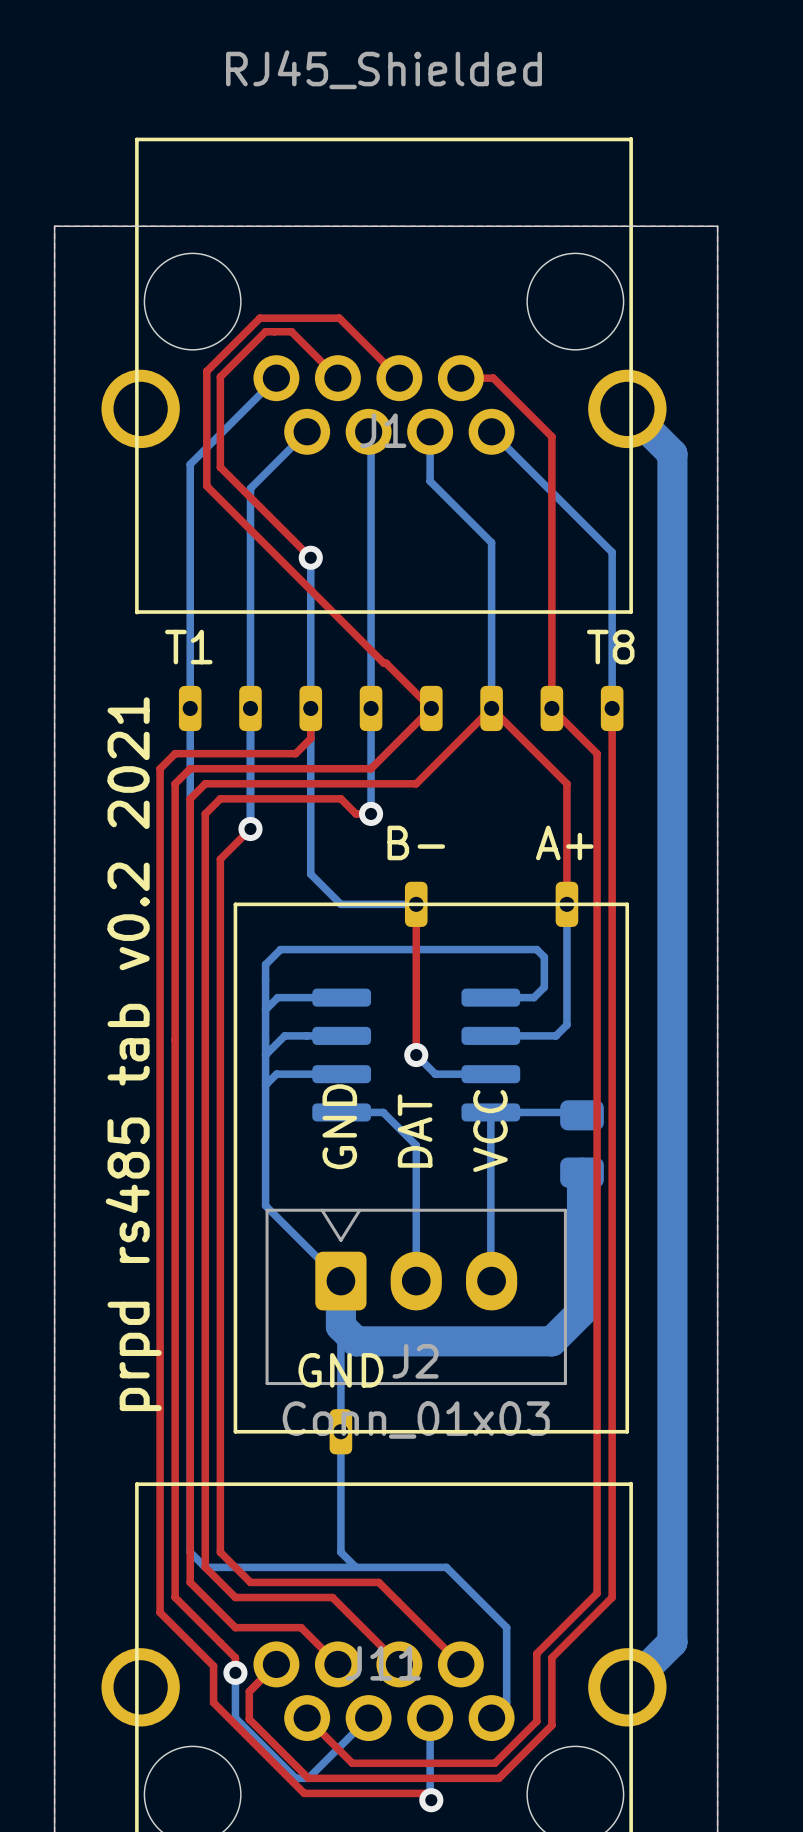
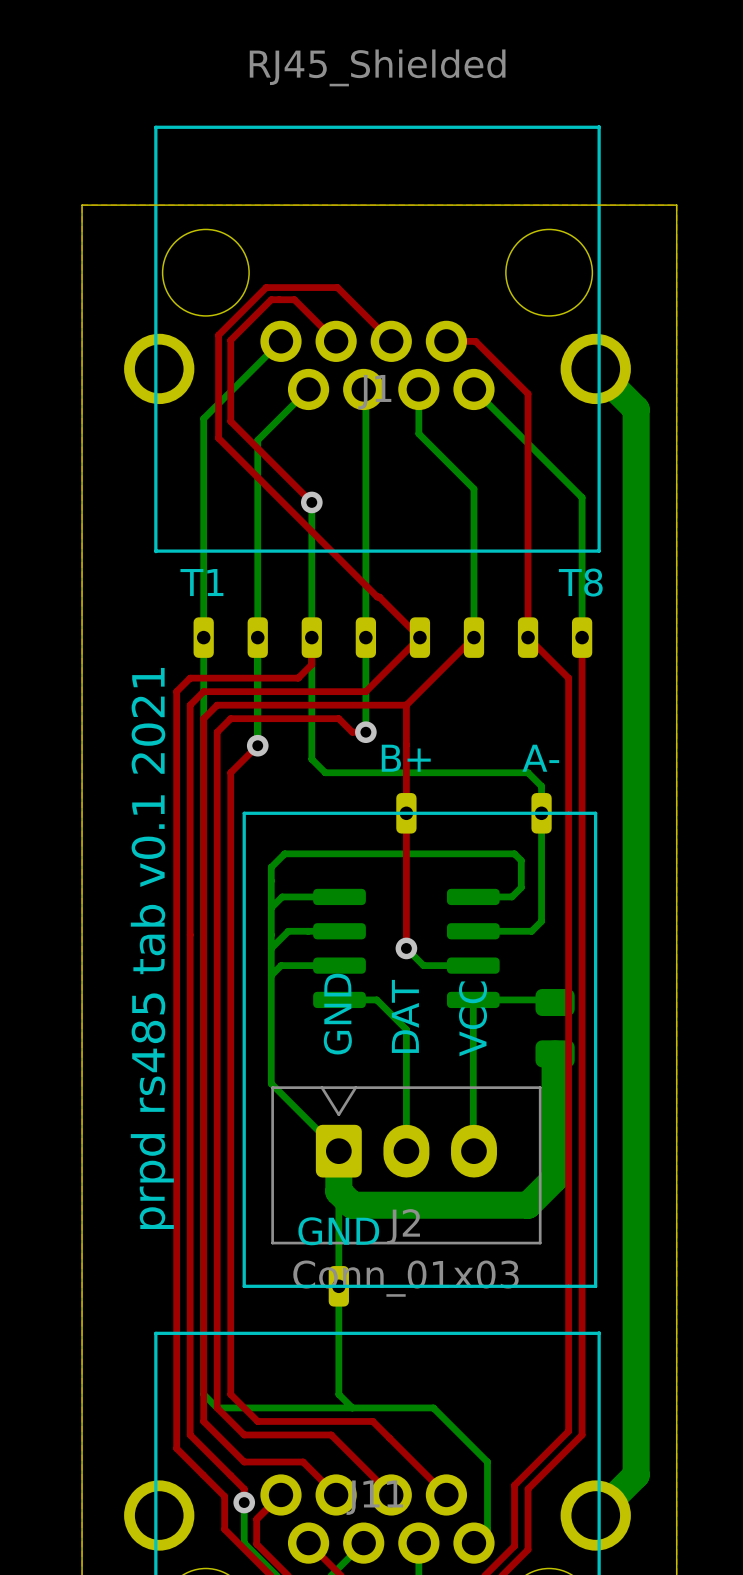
top track: (491, 708) (566, 783) (566, 904) -> none
top track: none -> (406, 705) (406, 813)
part value: B- (416, 842) -> B+ (406, 758)
part value: A+ (564, 842) -> A- (540, 758)
bottom track: (310, 844) (310, 874) (340, 904) (416, 904) -> (311, 759) (325, 772) (528, 772) (541, 786) (541, 813)
text: prpd rs485 tab v0.2 2021 (133, 1054) -> prpd rs485 tab v0.1 2021 (152, 948)

